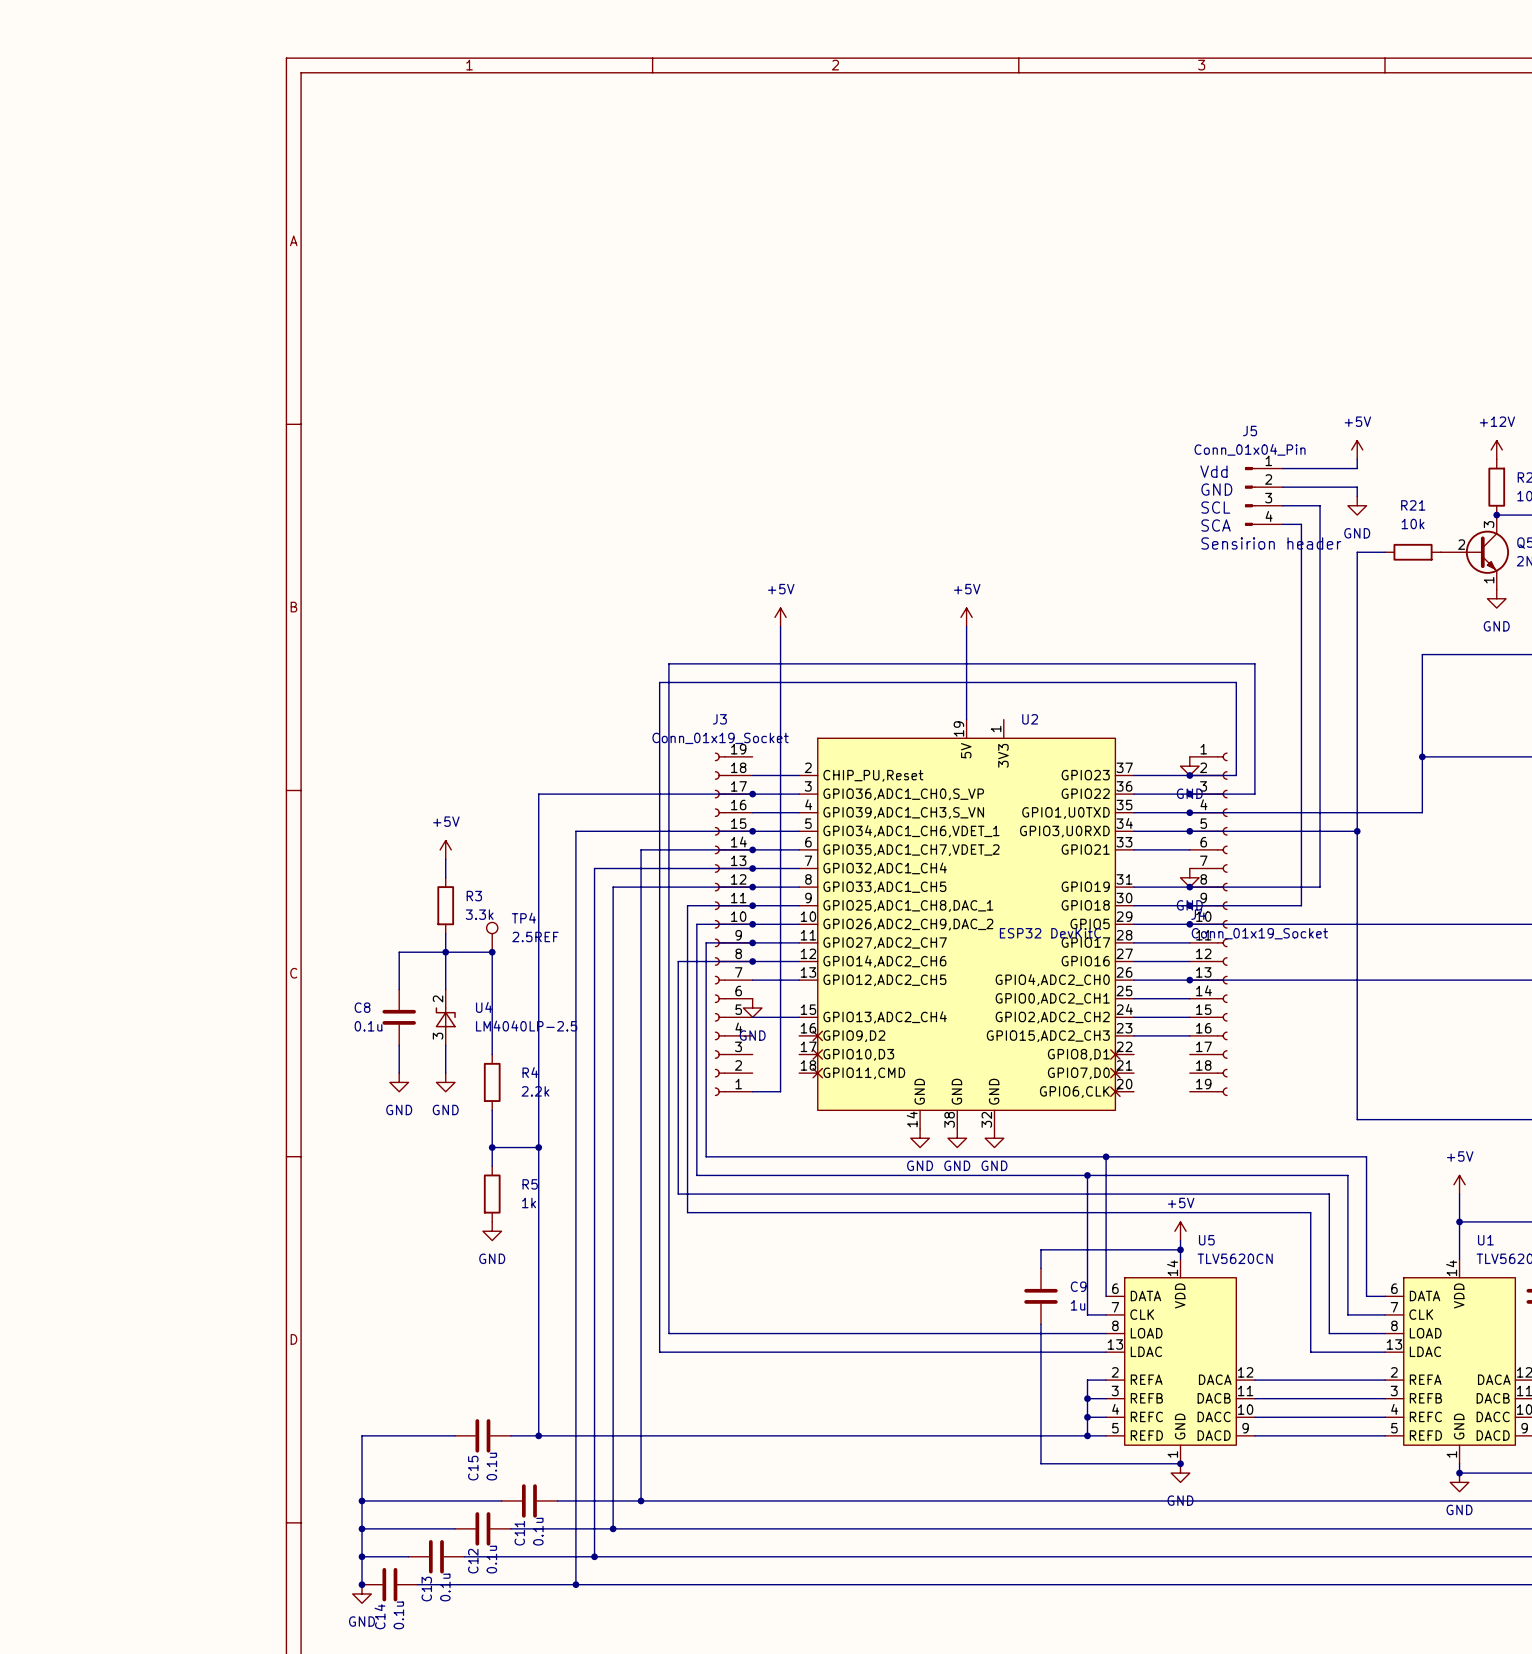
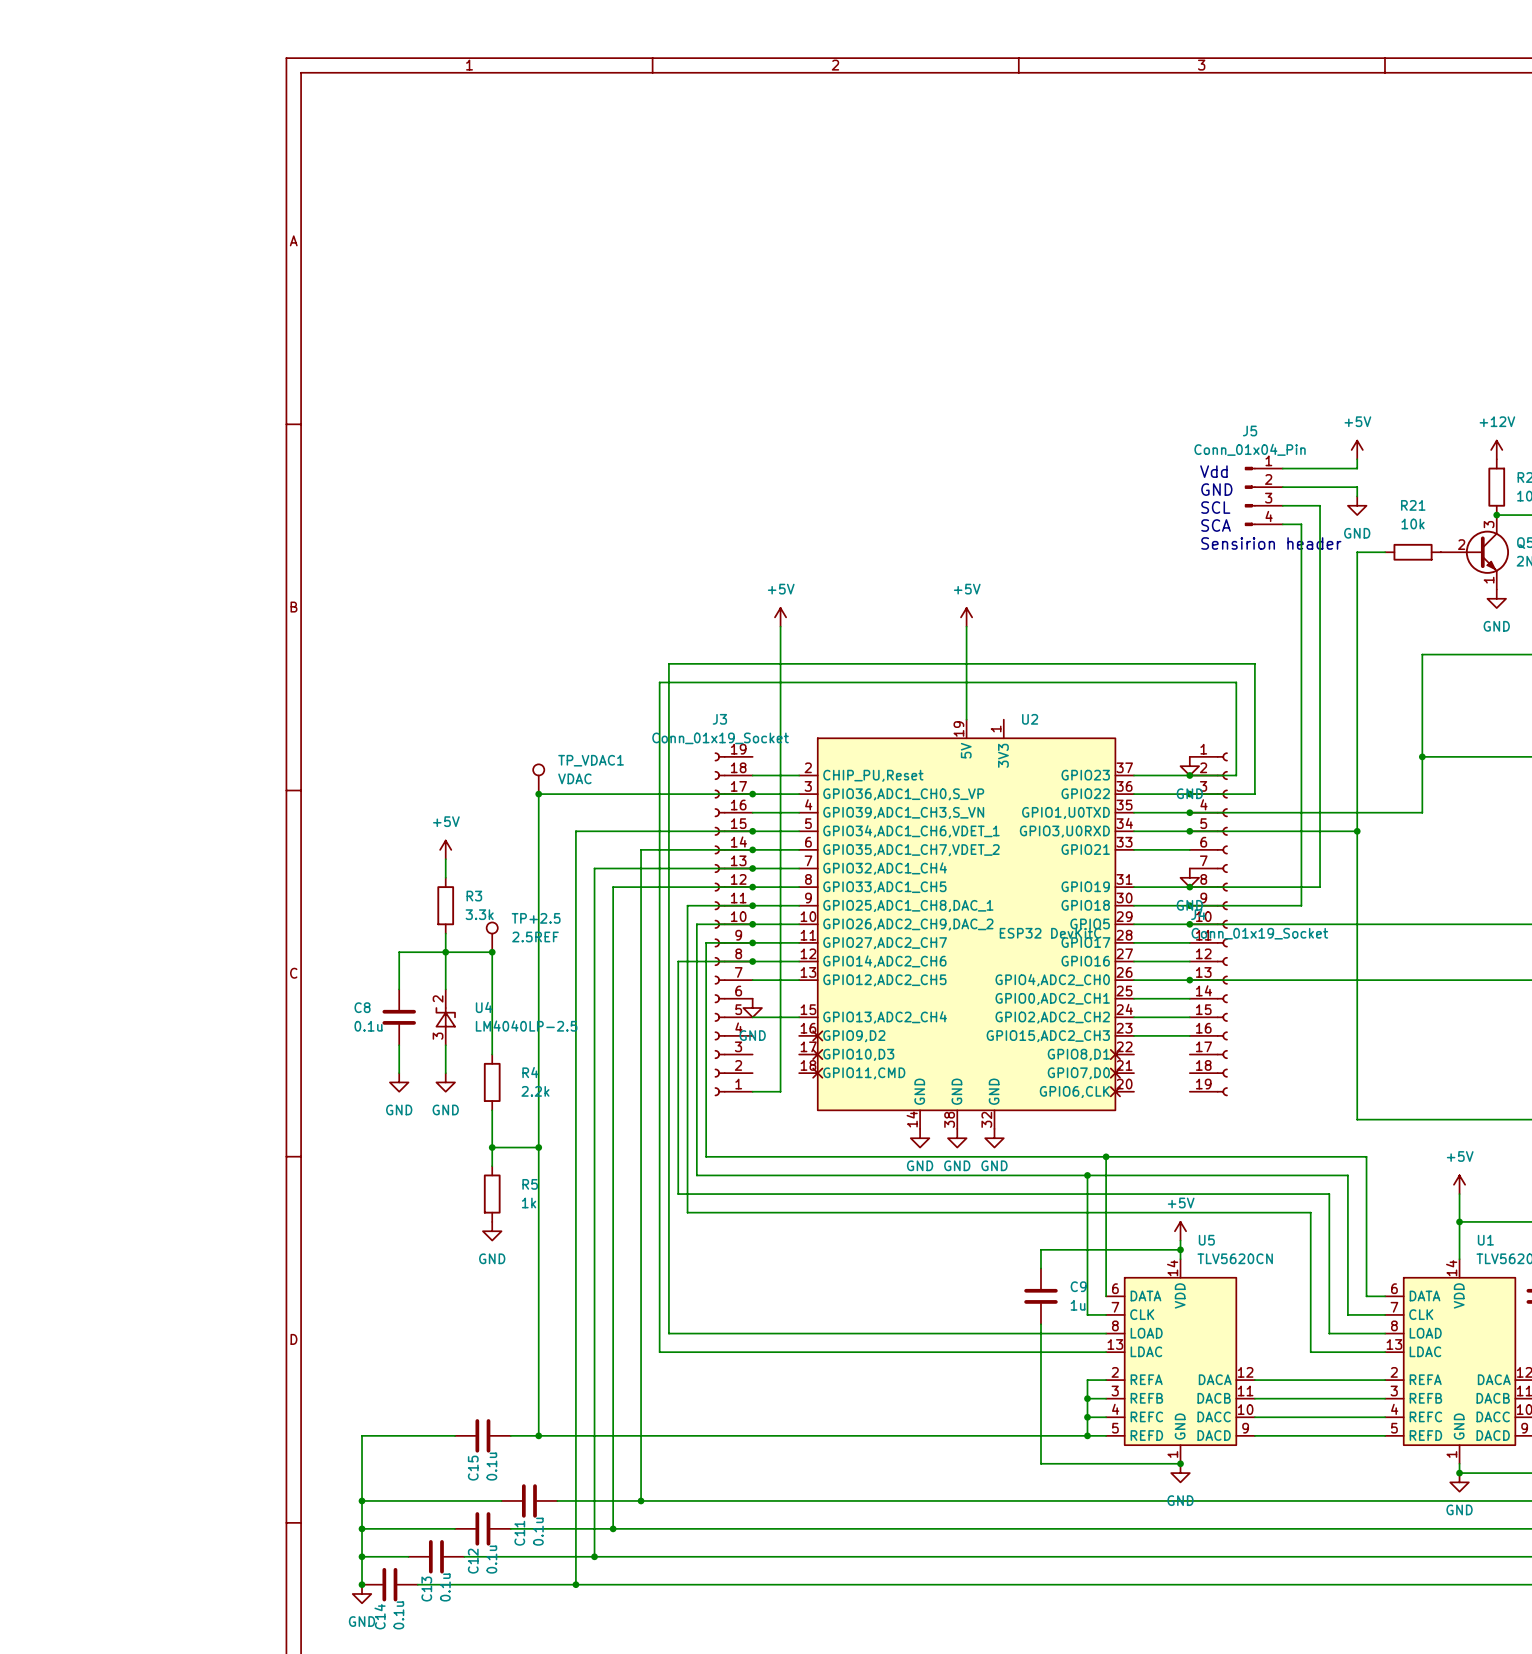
TP_VDAC1: none -> VDAC (538, 779)
junction: none -> (538, 794)
TP4 name: TP4 (523, 918) -> TP+2.5 (536, 918)

